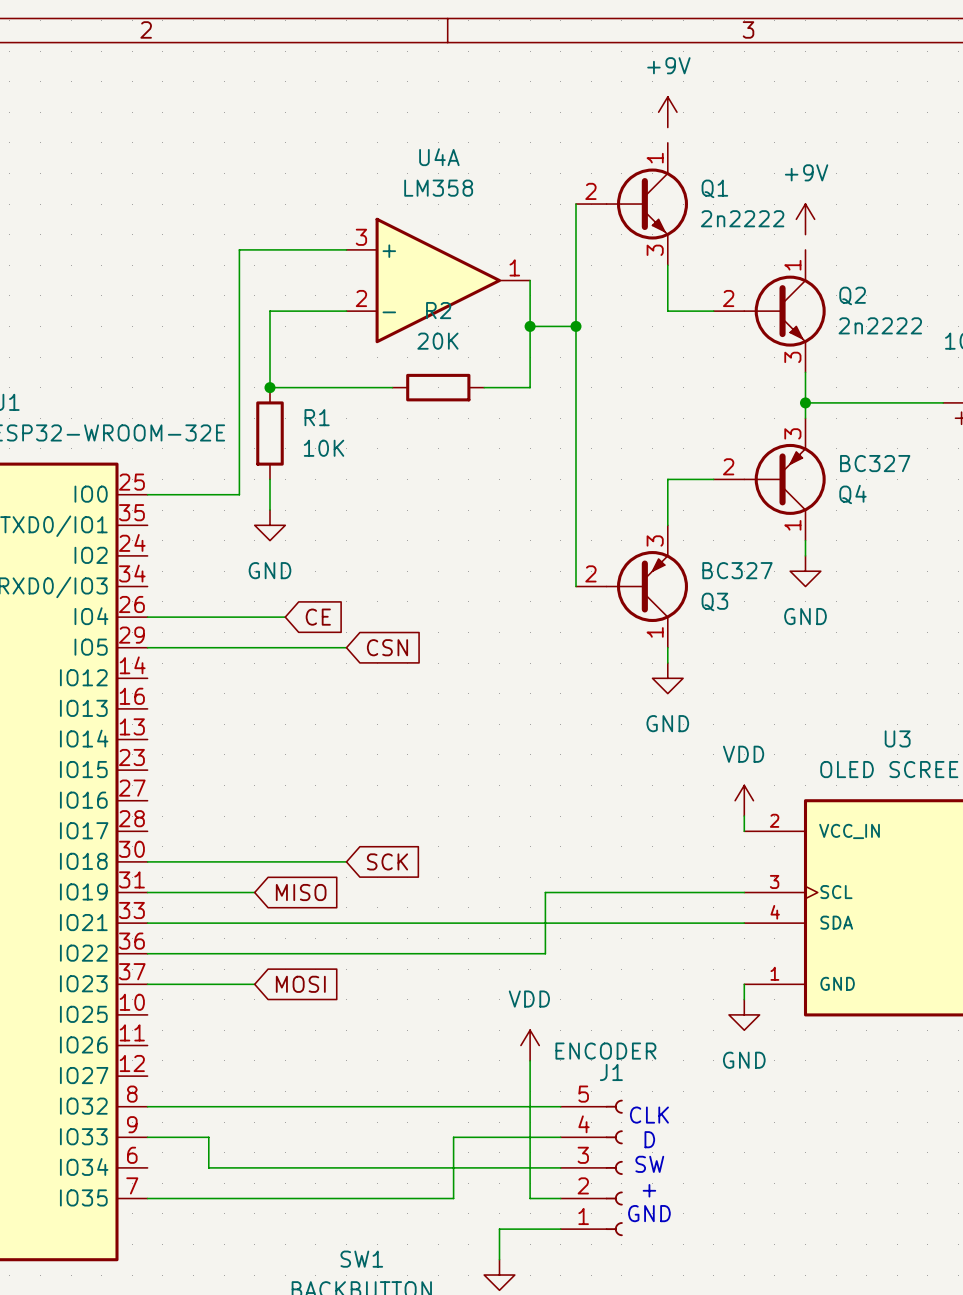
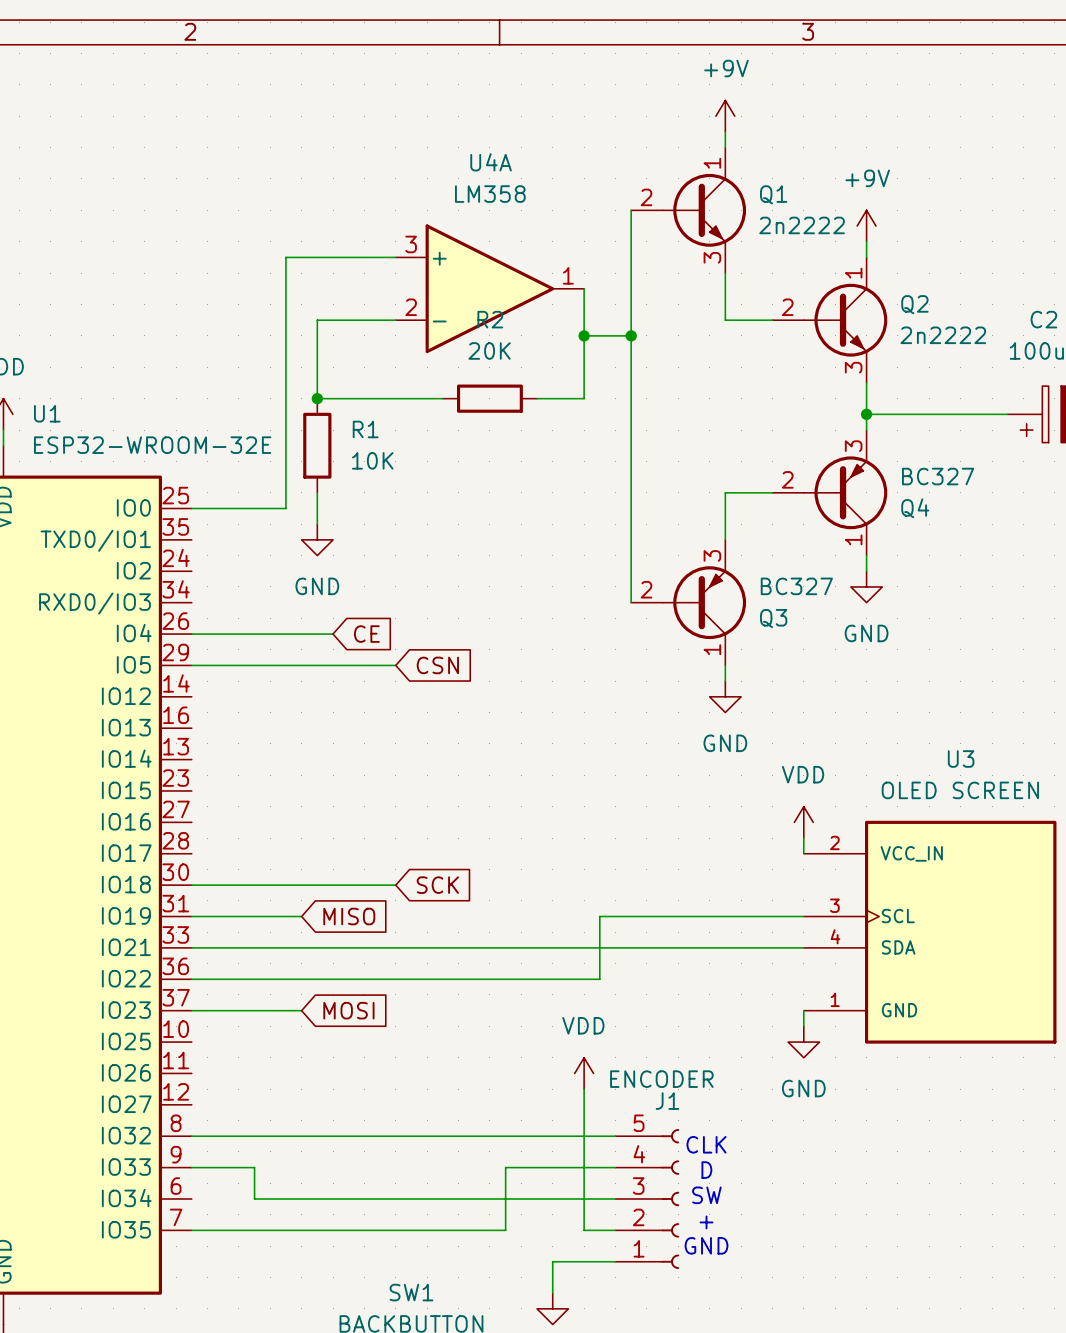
wire: none -> (725, 131) (725, 147)
wire: none -> (866, 241) (866, 257)

